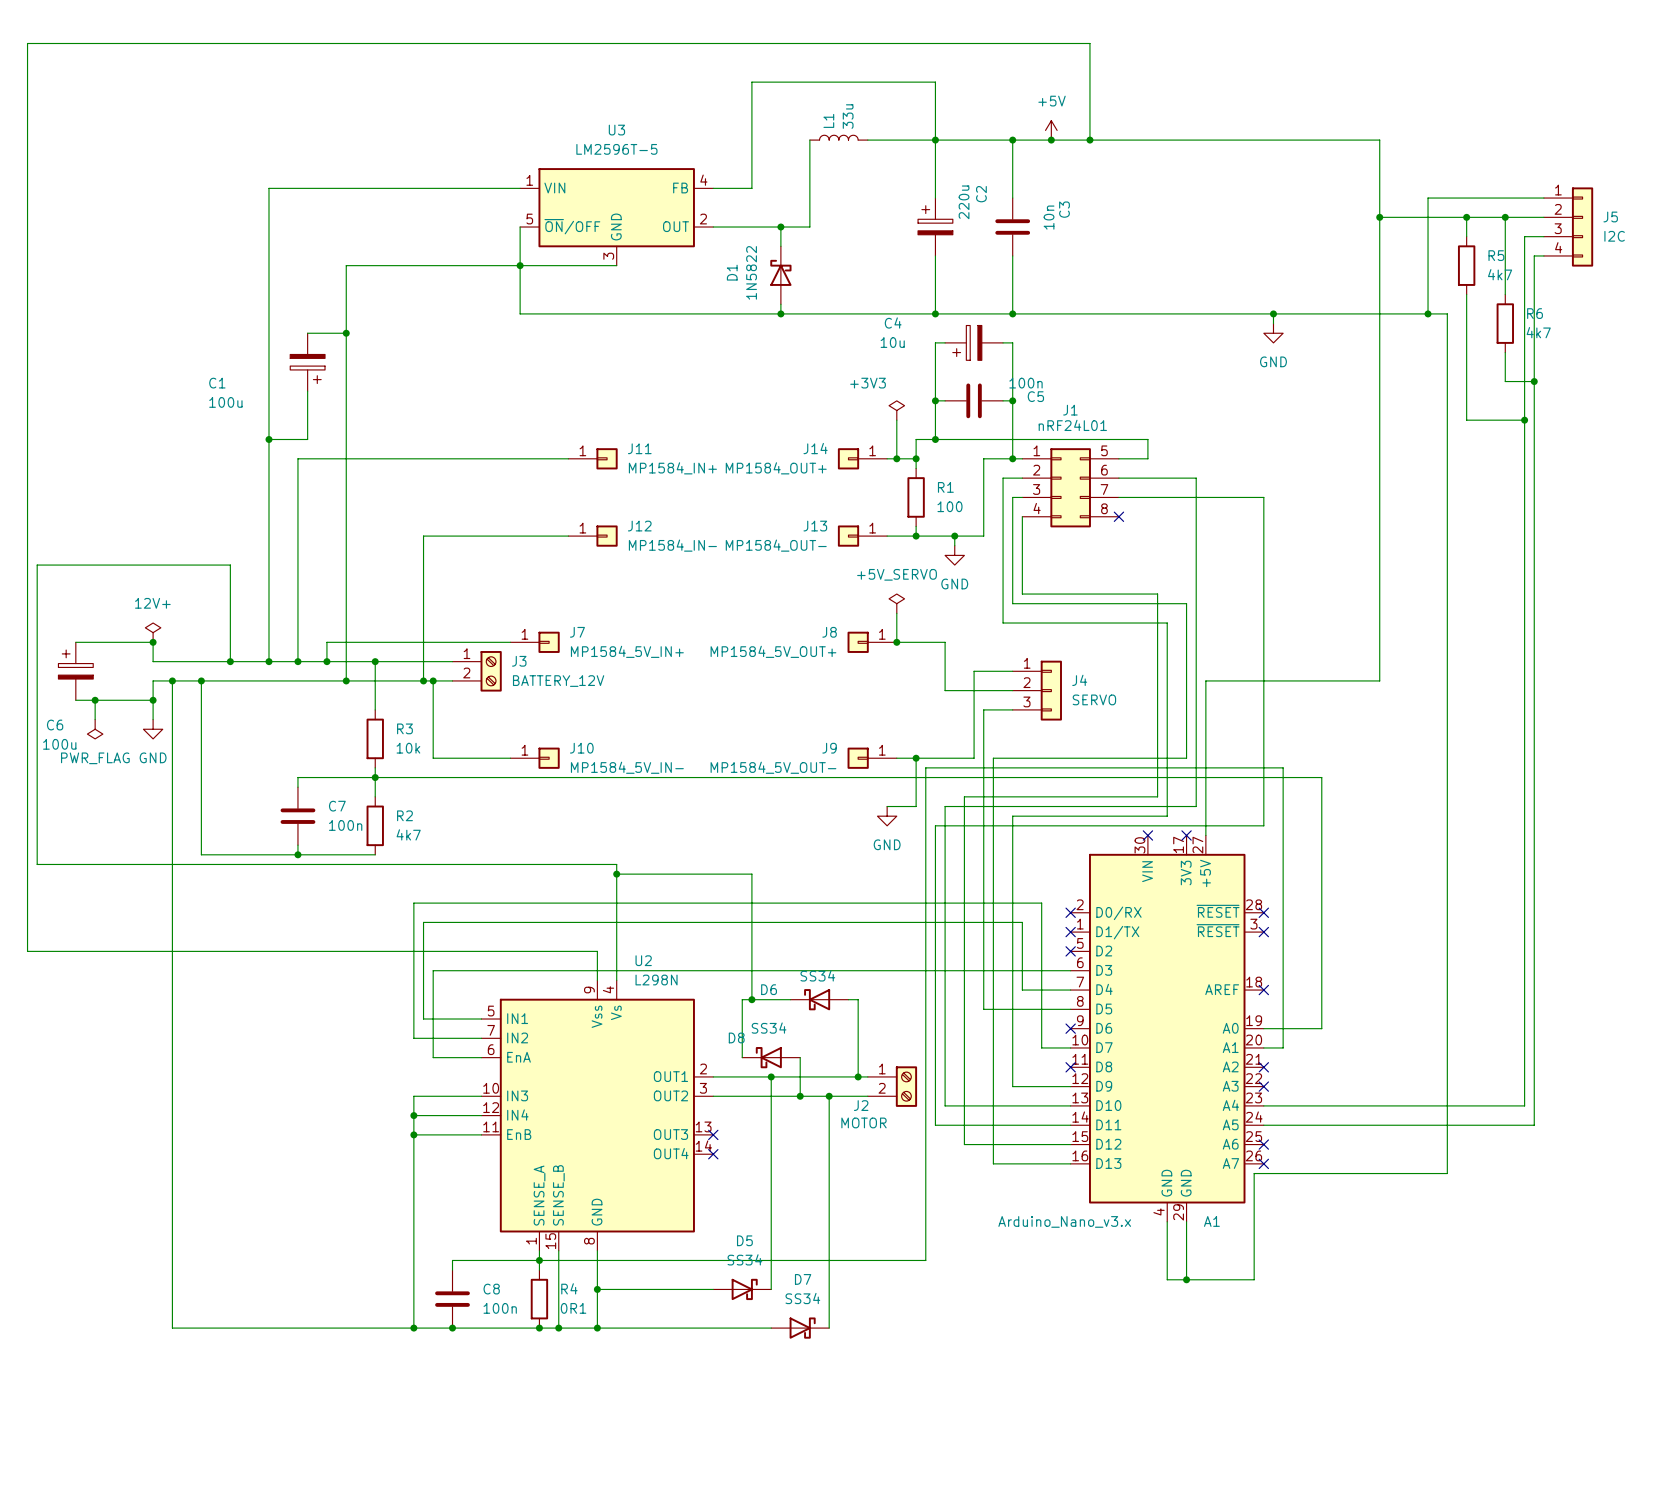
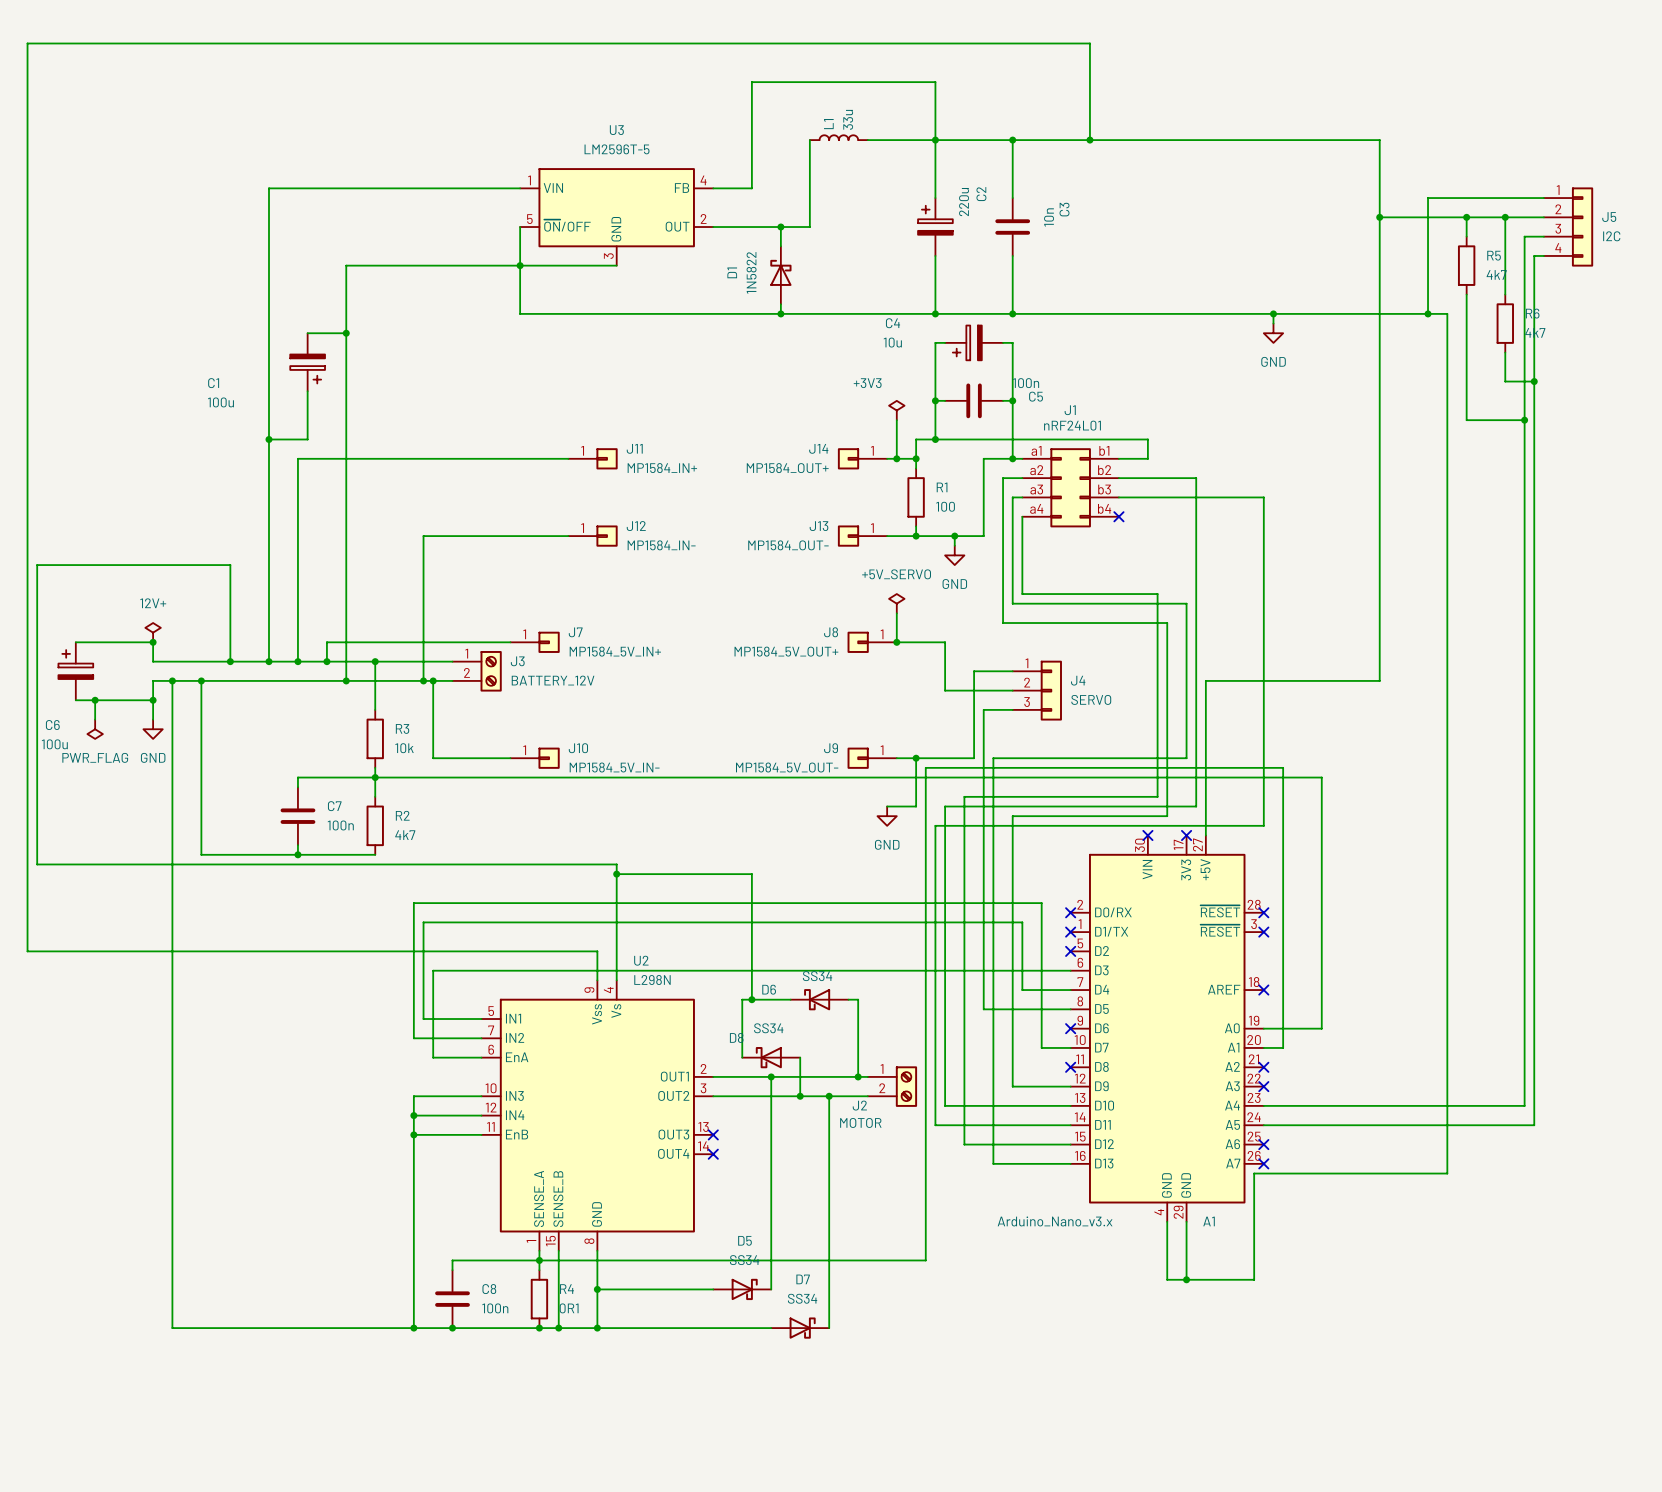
power symbol: +5V (1051, 130) -> none
junction: (1051, 140) -> none
J1 pin number: 1 (1036, 450) -> a1 (1036, 450)
J1 pin number: 5 (1104, 450) -> b1 (1104, 450)
J1 pin number: 2 (1036, 470) -> a2 (1036, 470)
J1 pin number: 6 (1104, 470) -> b2 (1104, 470)
J1 pin number: 3 (1036, 489) -> a3 (1036, 489)
J1 pin number: 7 (1104, 489) -> b3 (1104, 489)
J1 pin number: 4 (1037, 508) -> a4 (1036, 508)
J1 pin number: 8 (1104, 508) -> b4 (1104, 508)

